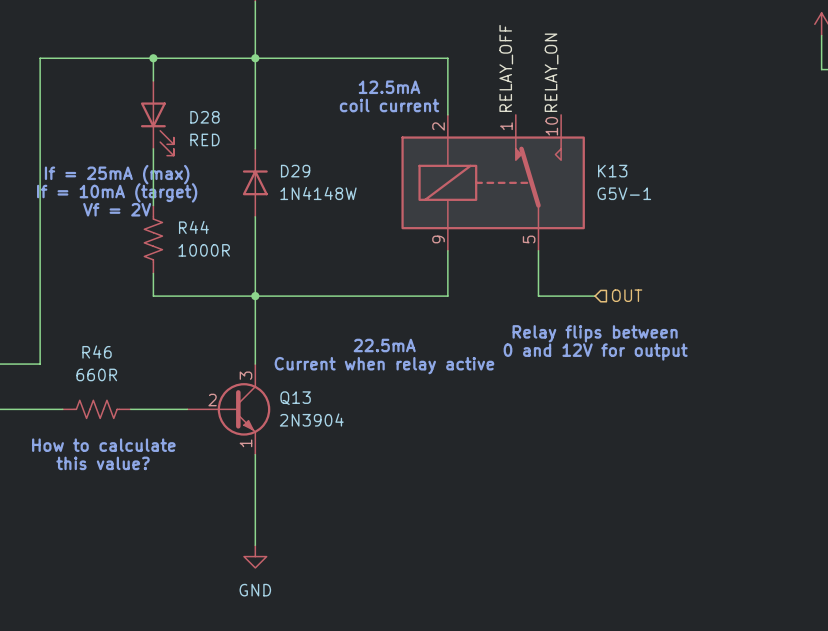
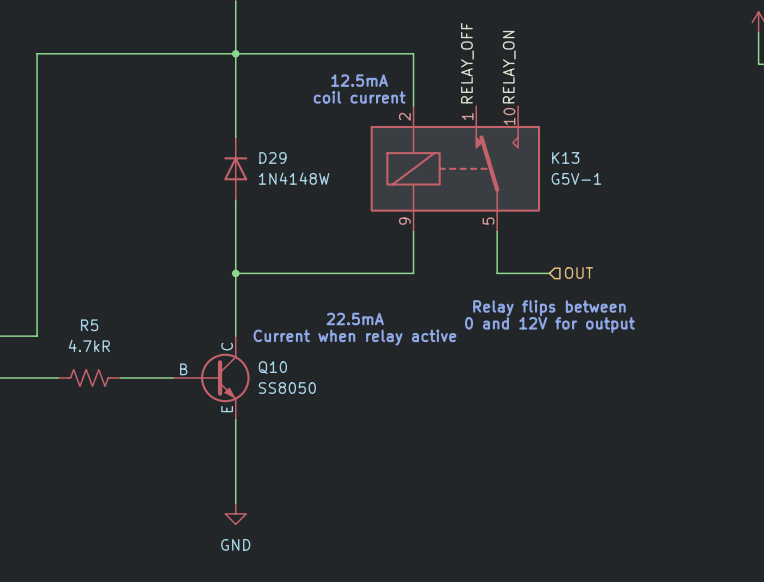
wire: (153, 58) (153, 80) -> none
junction: (153, 58) -> none
D28: RED (157, 118) -> none
wire: (153, 148) (153, 205) -> none
text: If = 25mA (max) (117, 174) -> none
text: If = 10mA (target) (117, 192) -> none
text: Vf = 2V (117, 209) -> none
R44: 1000R (153, 239) -> none
wire: (153, 273) (153, 296) (255, 296) -> none
R46 name: R46 (97, 352) -> R5 (89, 325)
R46 value: 660R (96, 374) -> 4.7kR (89, 345)
Q13: 2N3904 (228, 409) -> none
Q10: none -> SS8050 (211, 377)
text: How to calculate (103, 445) -> none
text: this value? (103, 463) -> none

